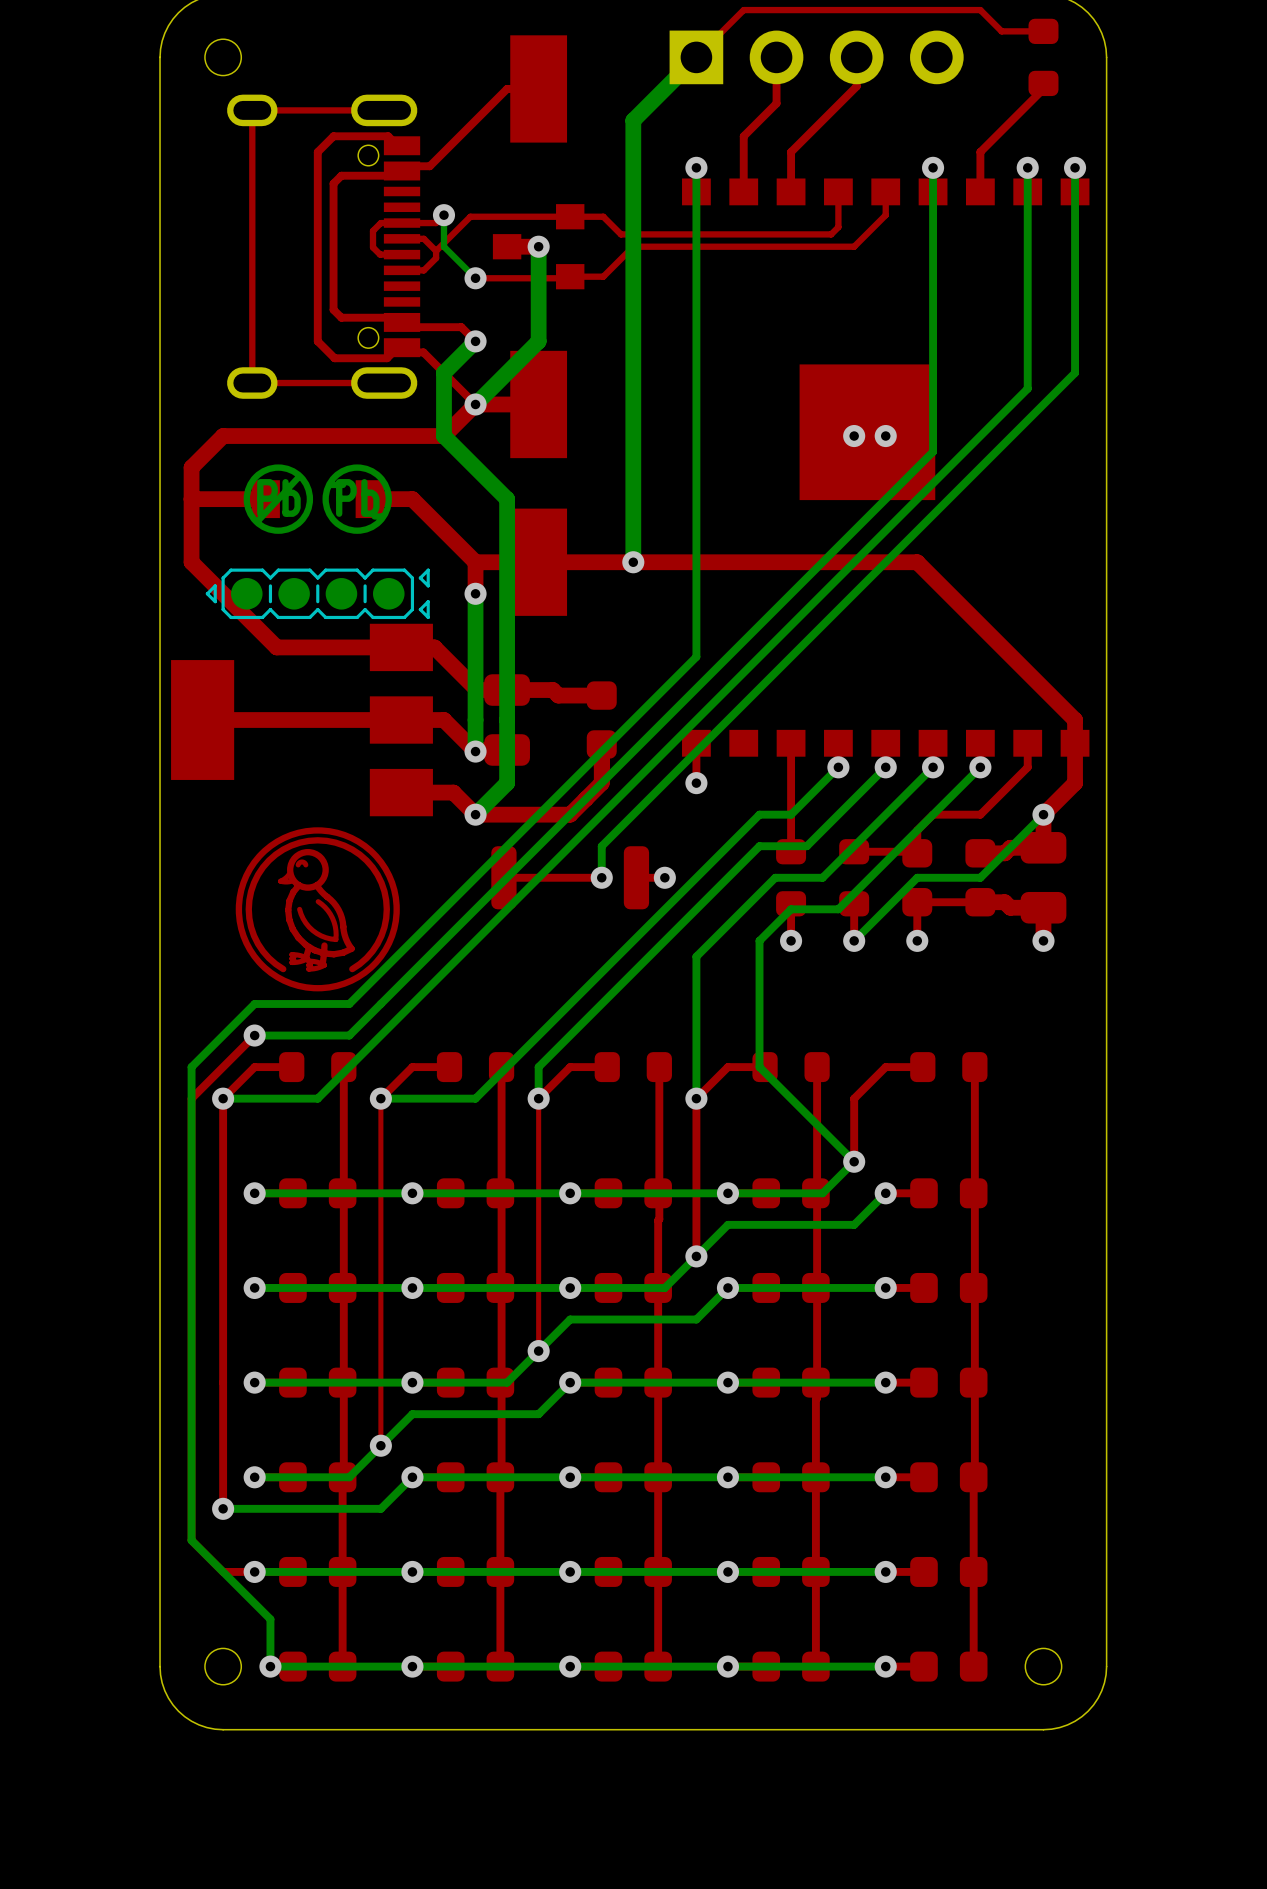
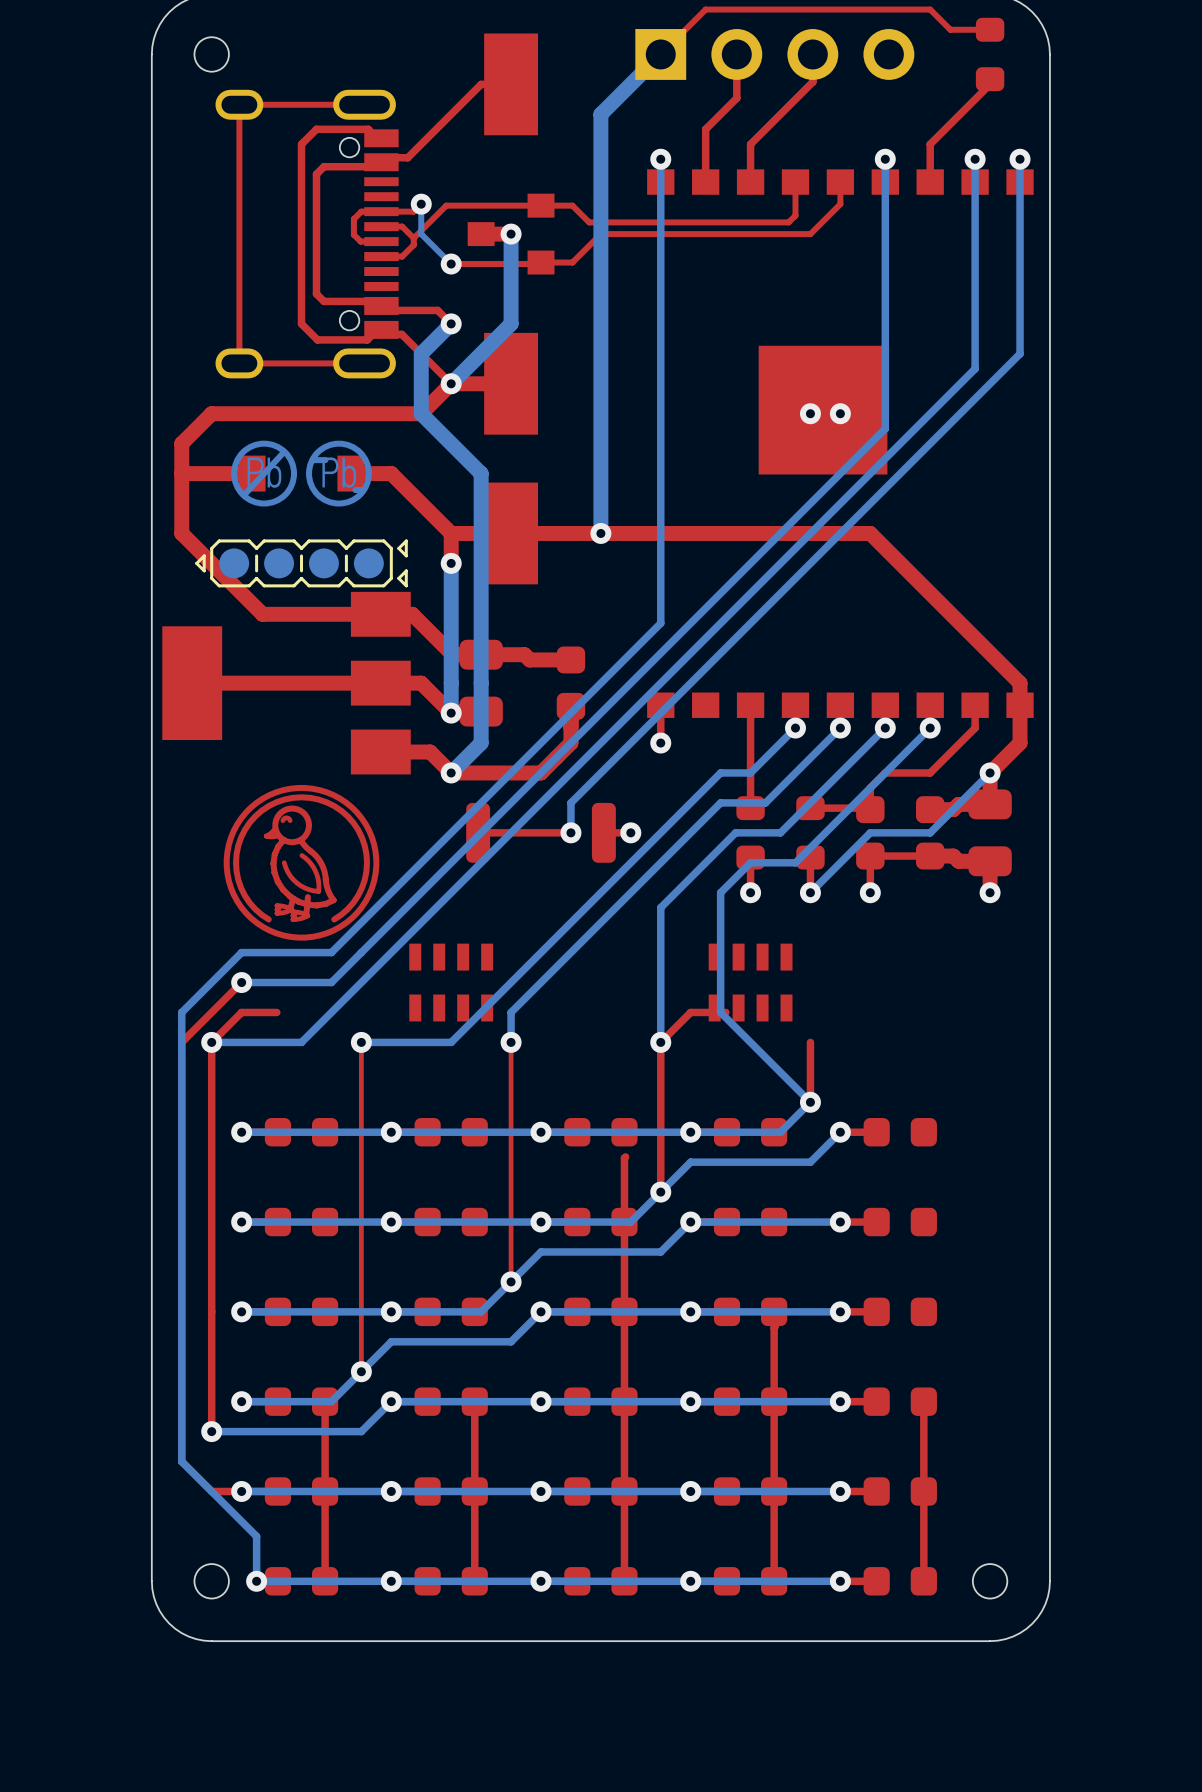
part footprint: [436, 1052, 515, 1083] -> [409, 943, 494, 1022]
part footprint: [752, 1052, 830, 1083] -> [708, 943, 793, 1022]
part: (317, 1067) -> none
top track: (343, 1067) (343, 1476) -> none
top track: (449, 1067) (412, 1067) (380, 1098) -> none
top track: (501, 1067) (501, 1476) -> none
top track: (607, 1067) (570, 1067) (538, 1098) -> none
part: (633, 1067) -> none
top track: (659, 1067) (659, 1219) -> none
top track: (817, 1067) (817, 1398) -> none
top track: (922, 1067) (885, 1067) (854, 1098) -> none
part: (948, 1067) -> none
top track: (974, 1067) (974, 1476) -> none

